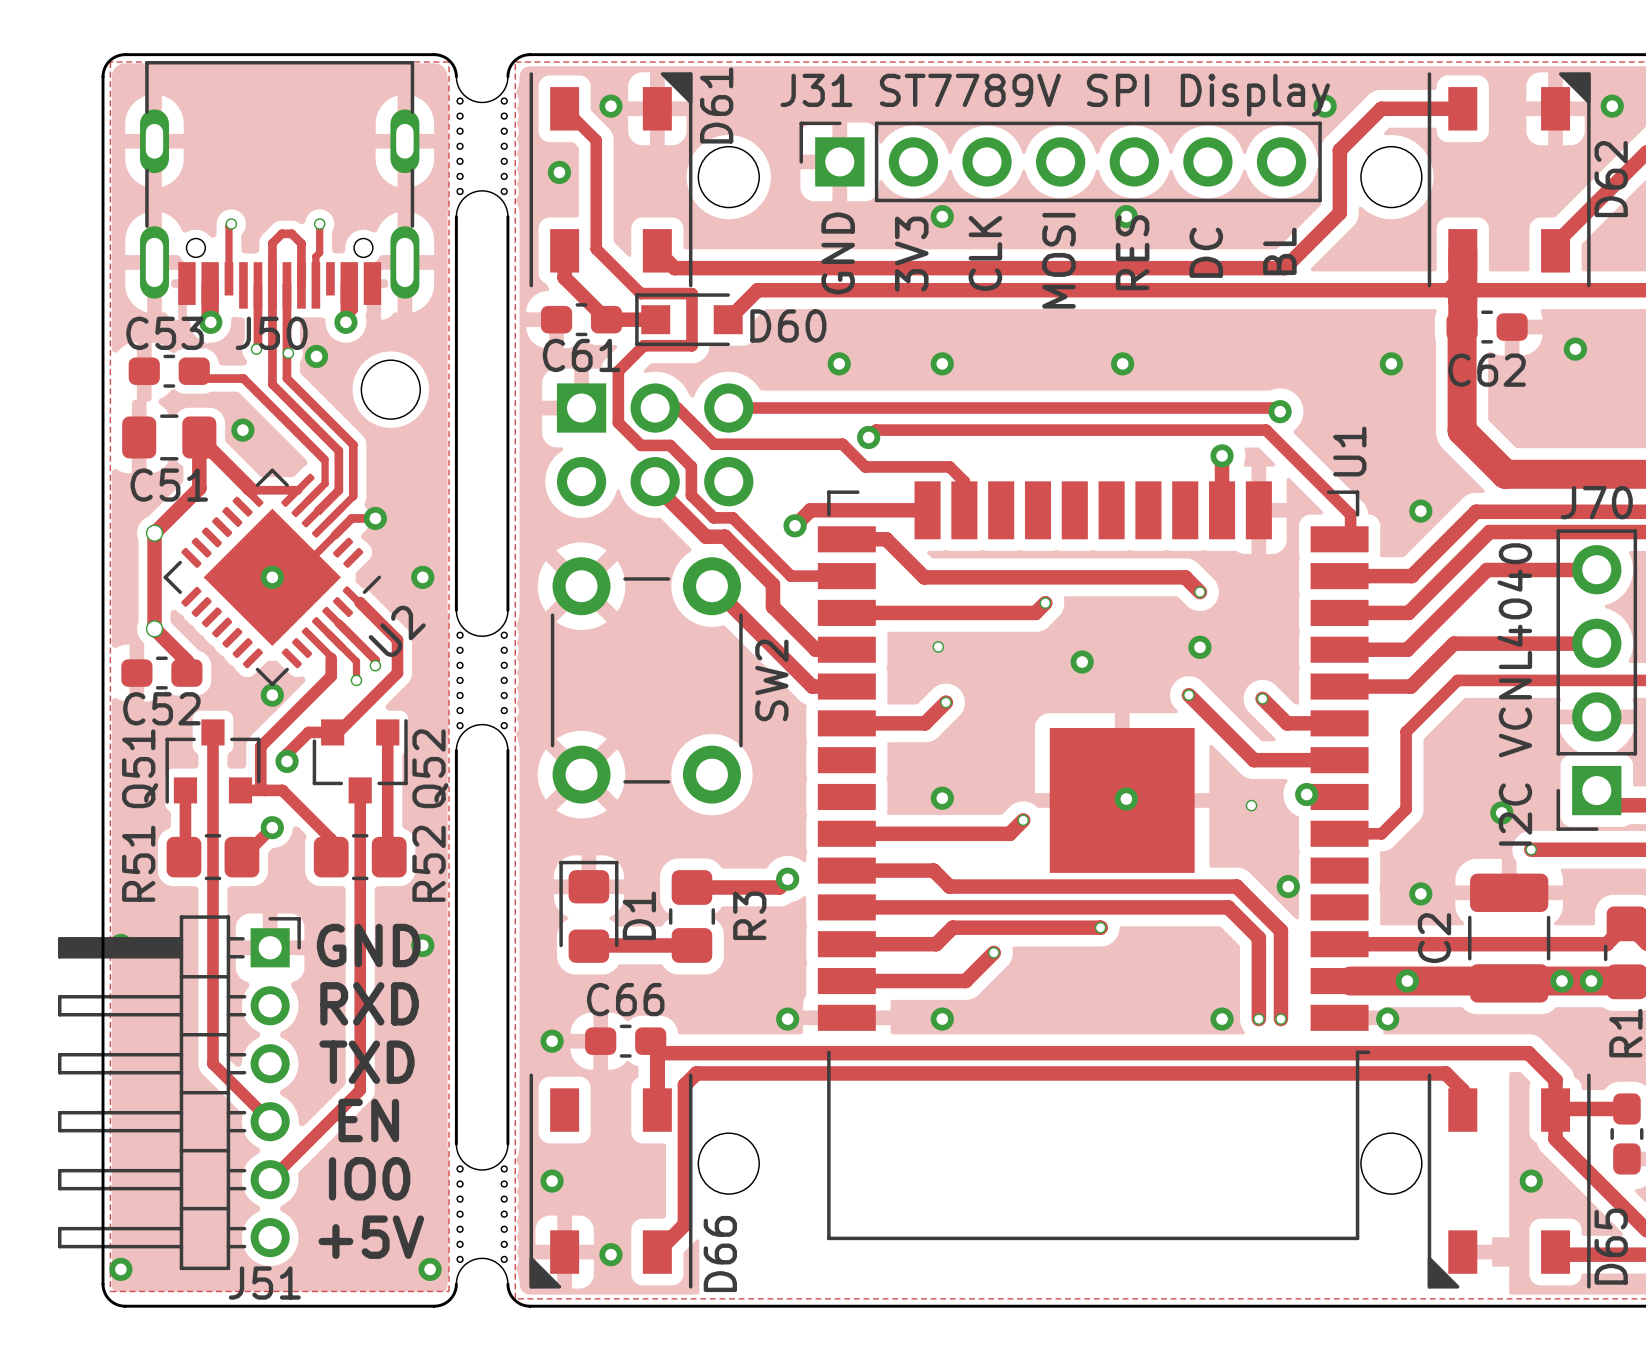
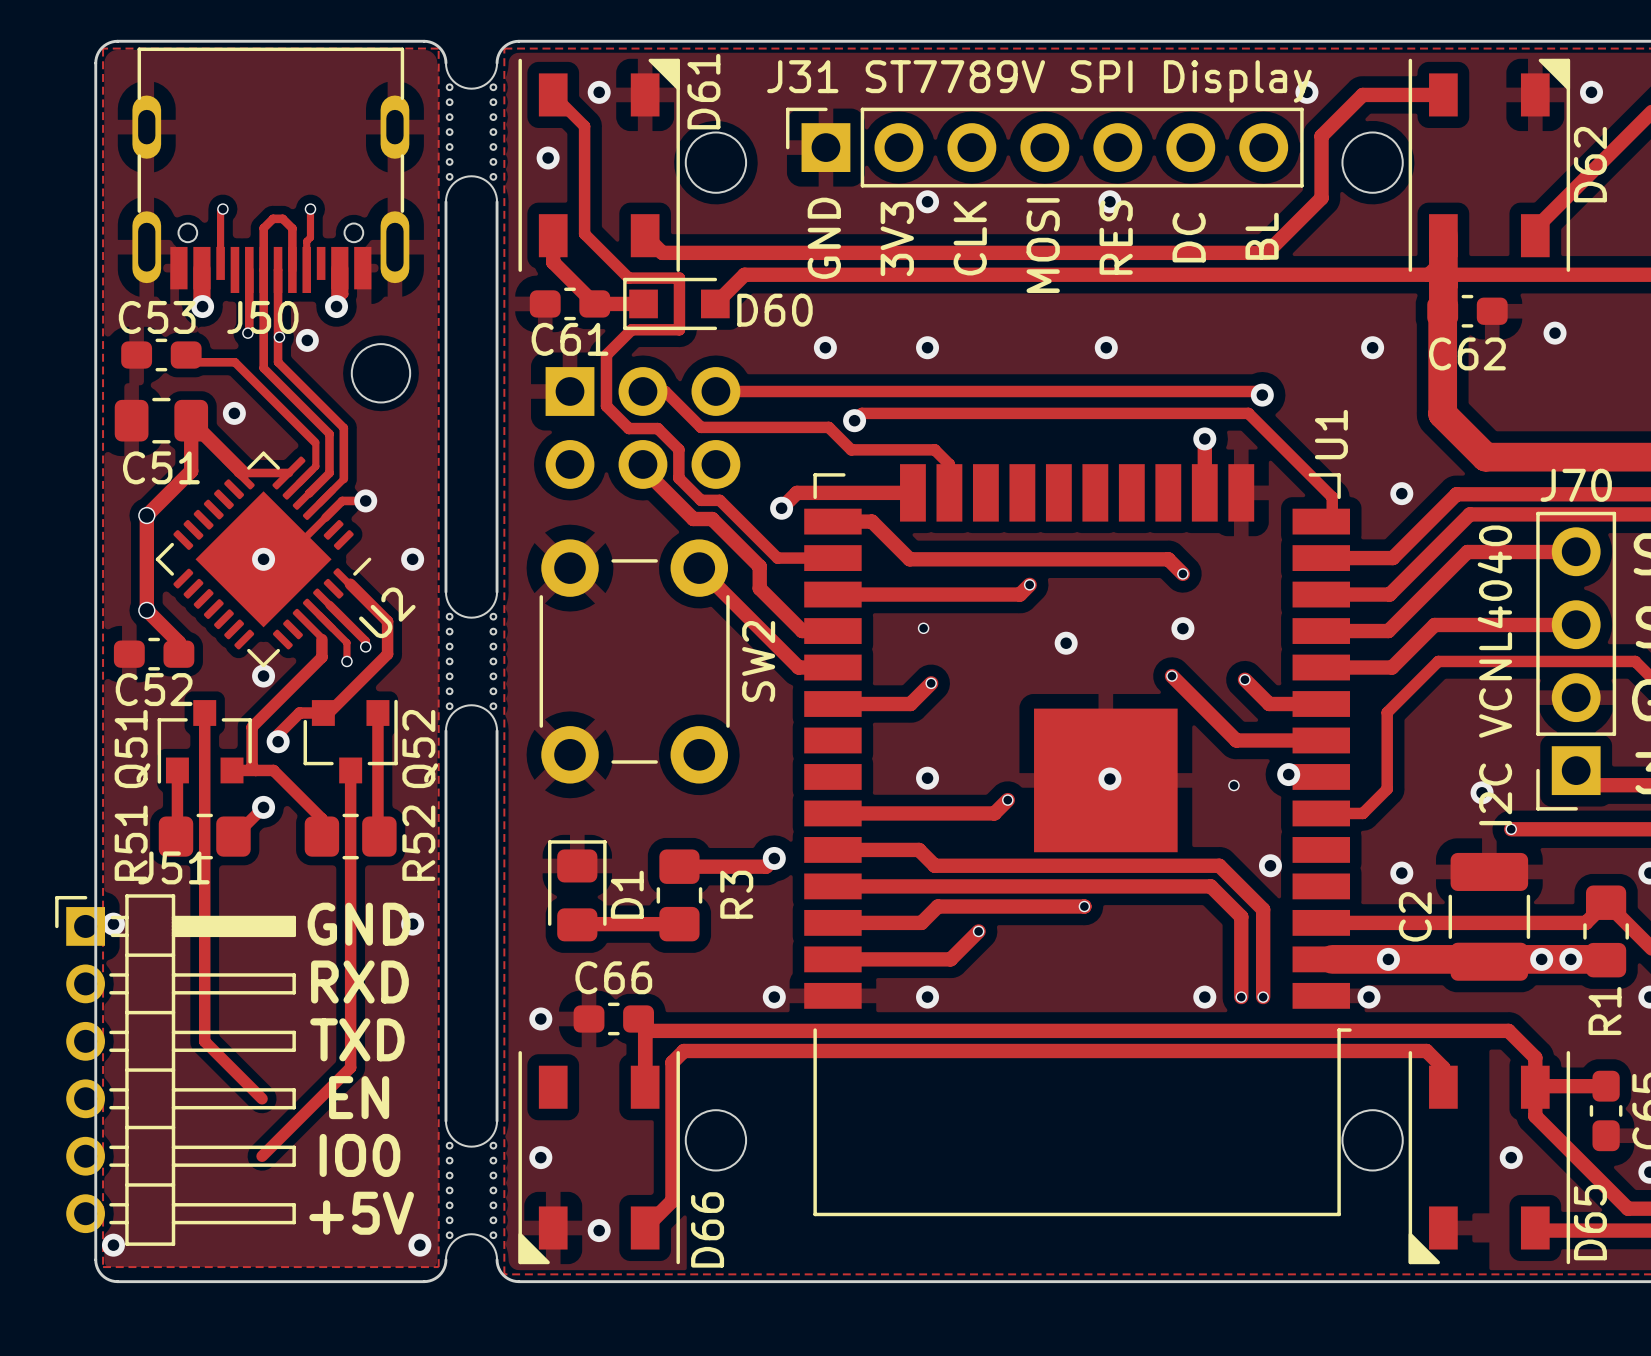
J51 footprint: [57, 915, 301, 1271] -> [55, 894, 296, 1246]
J51 name position: J51 (264, 1283) -> J51 (173, 867)

